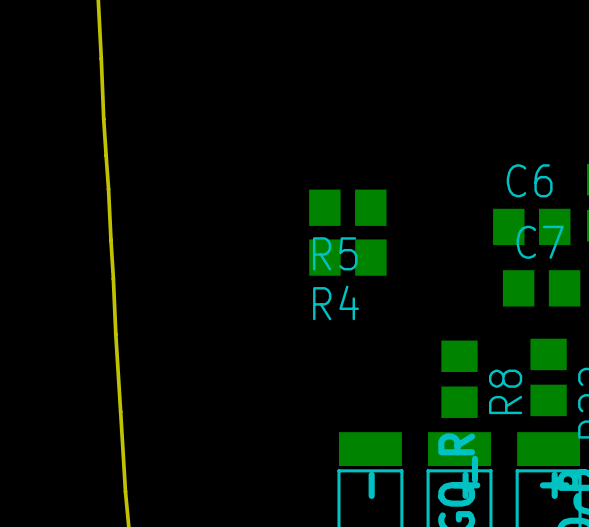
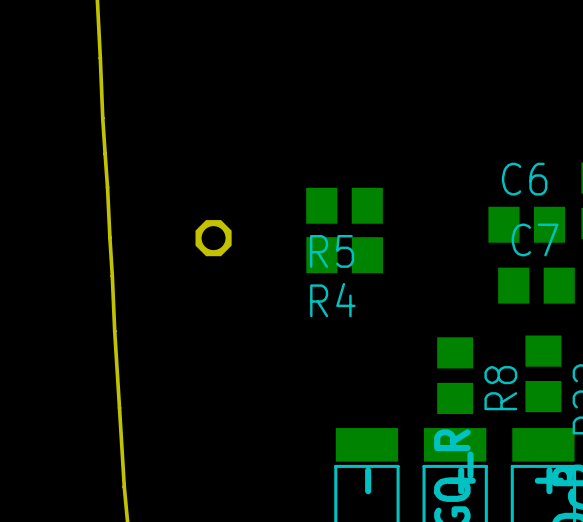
part: none -> (213, 238)

